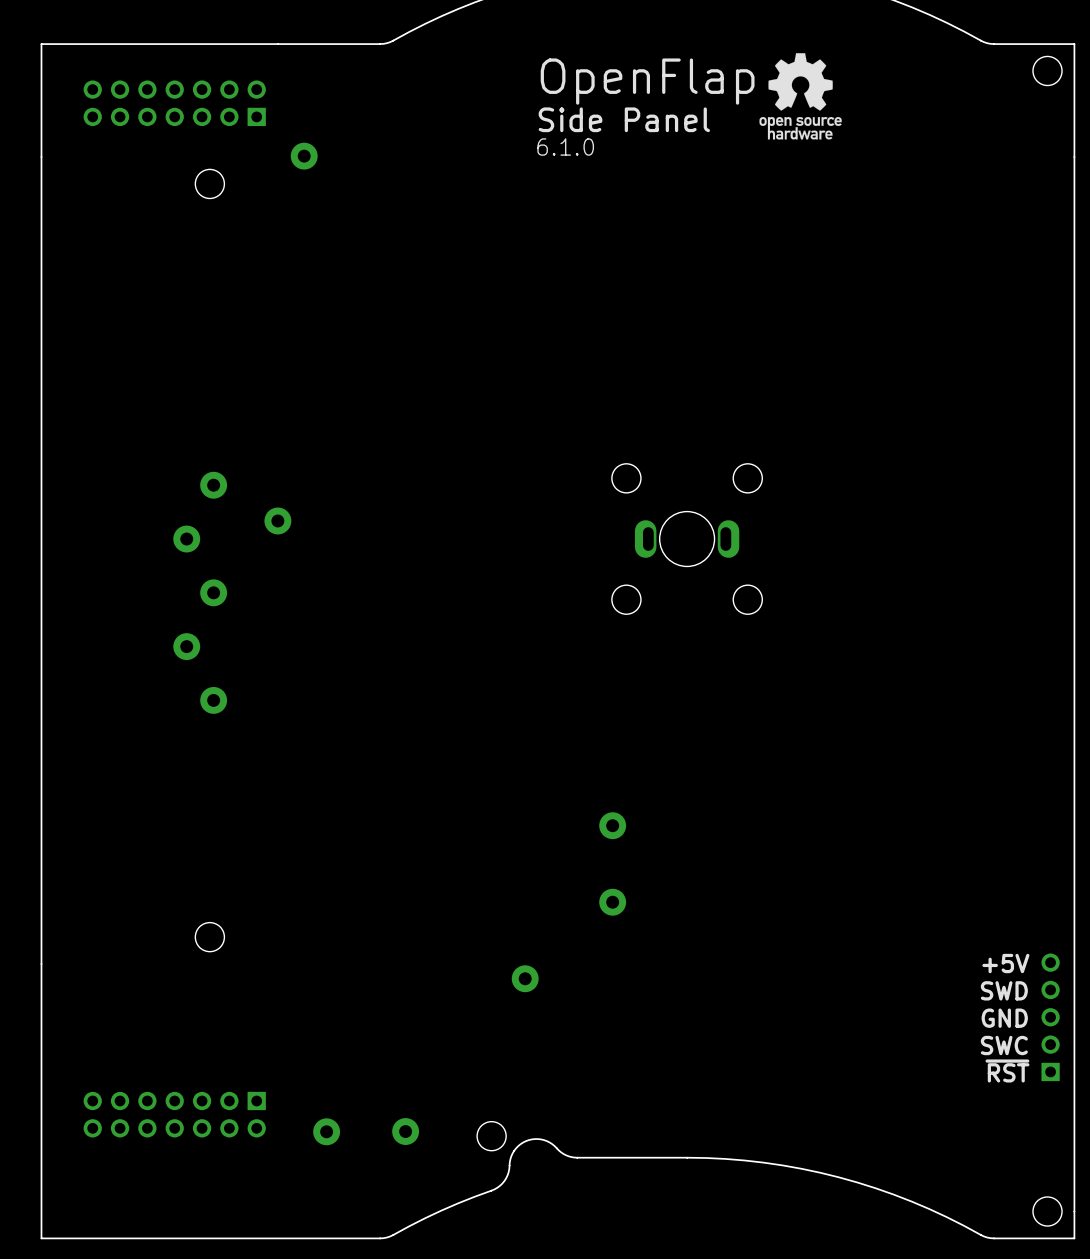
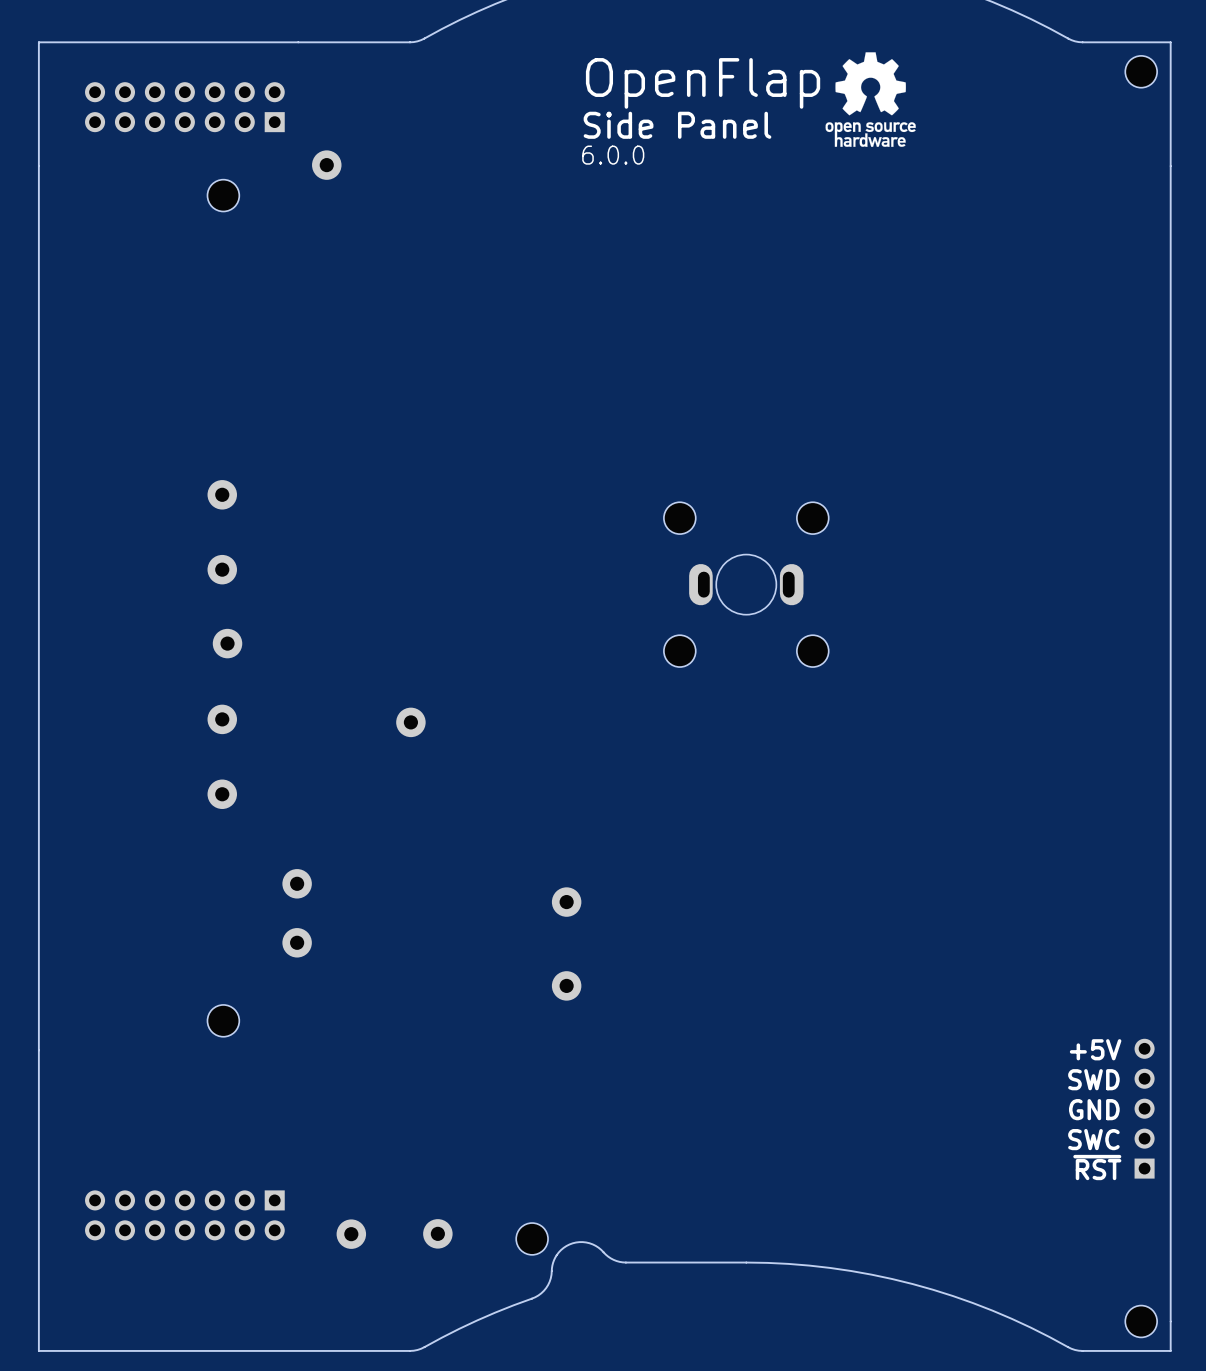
text: 6.1.0 (565, 147) -> 6.0.0 (613, 155)
part: none -> (222, 494)
part: (213, 485) -> none
part: (277, 520) -> none
part: none -> (222, 569)
part: (186, 539) -> none
part: (186, 646) -> none
part: none -> (222, 719)
part: none -> (410, 722)
part: (213, 700) -> none
part: none -> (222, 794)
part: none -> (297, 883)
part: (612, 825) -> none
part: none -> (566, 902)
part: none -> (297, 942)
part: (612, 902) -> none
part: none -> (566, 985)
part: (525, 978) -> none

